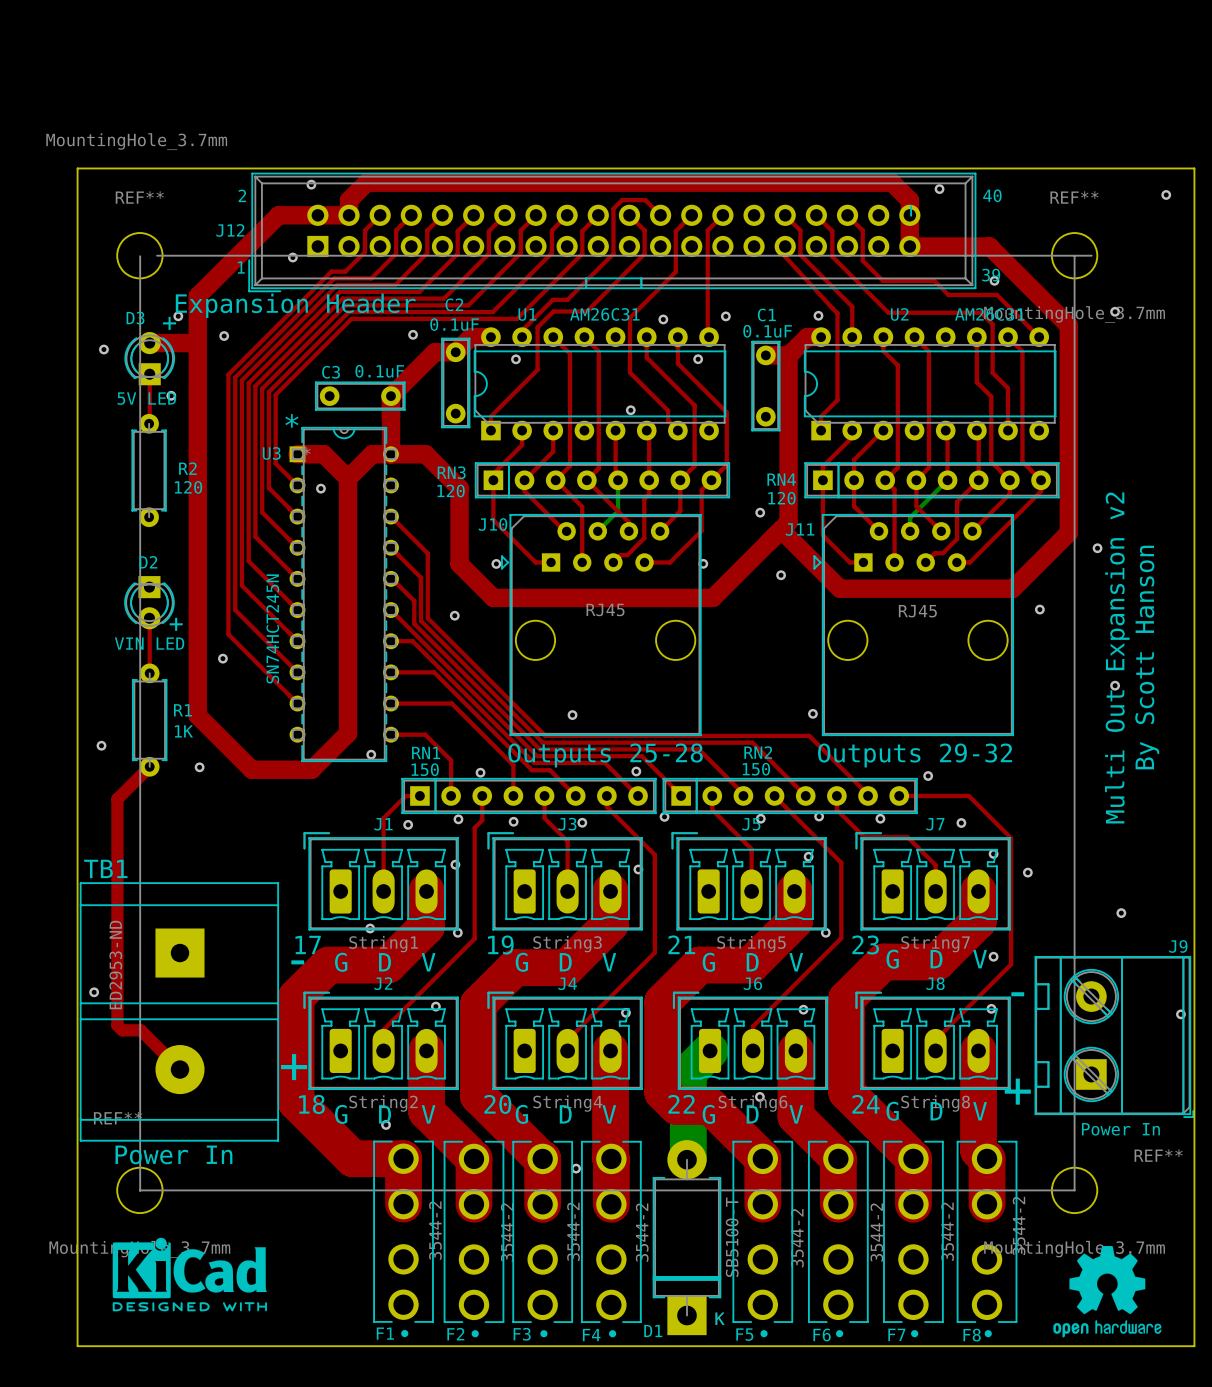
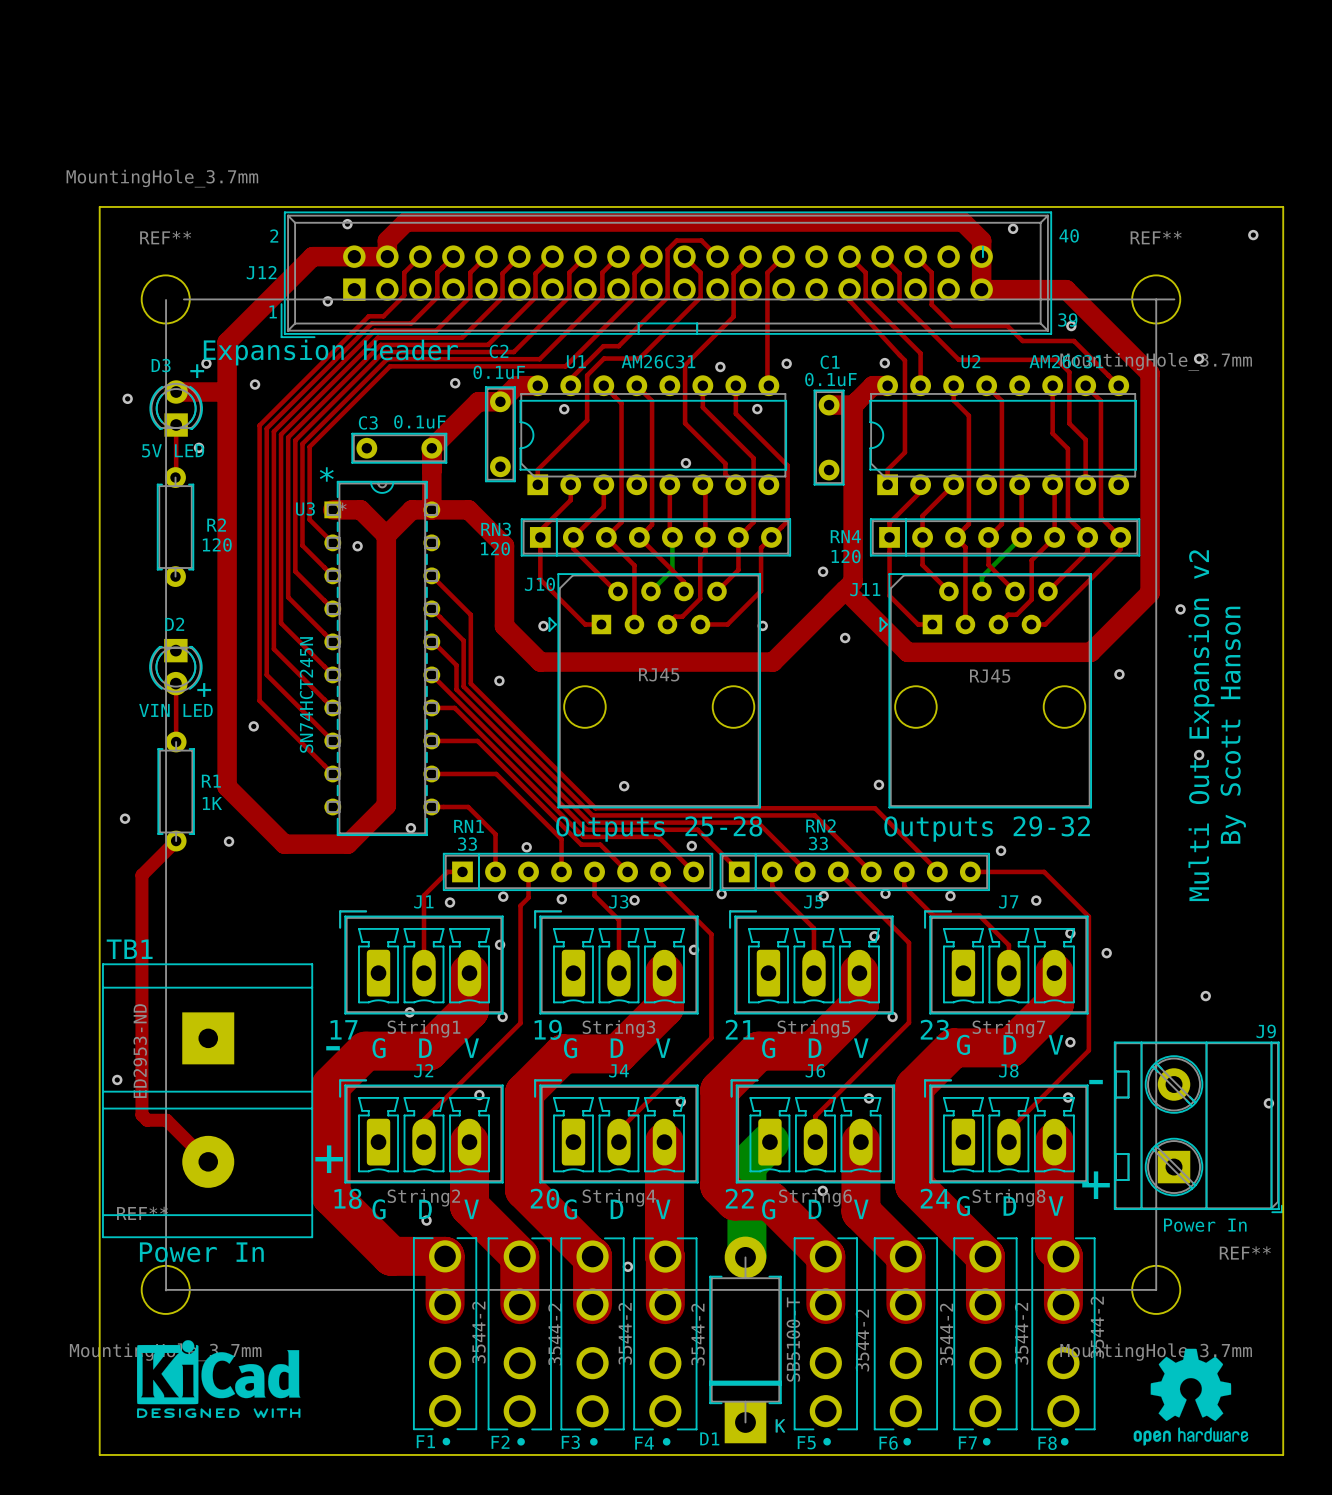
RN1 value: 150 (425, 769) -> 33 (467, 844)
RN2 value: 150 (756, 769) -> 33 (818, 843)

